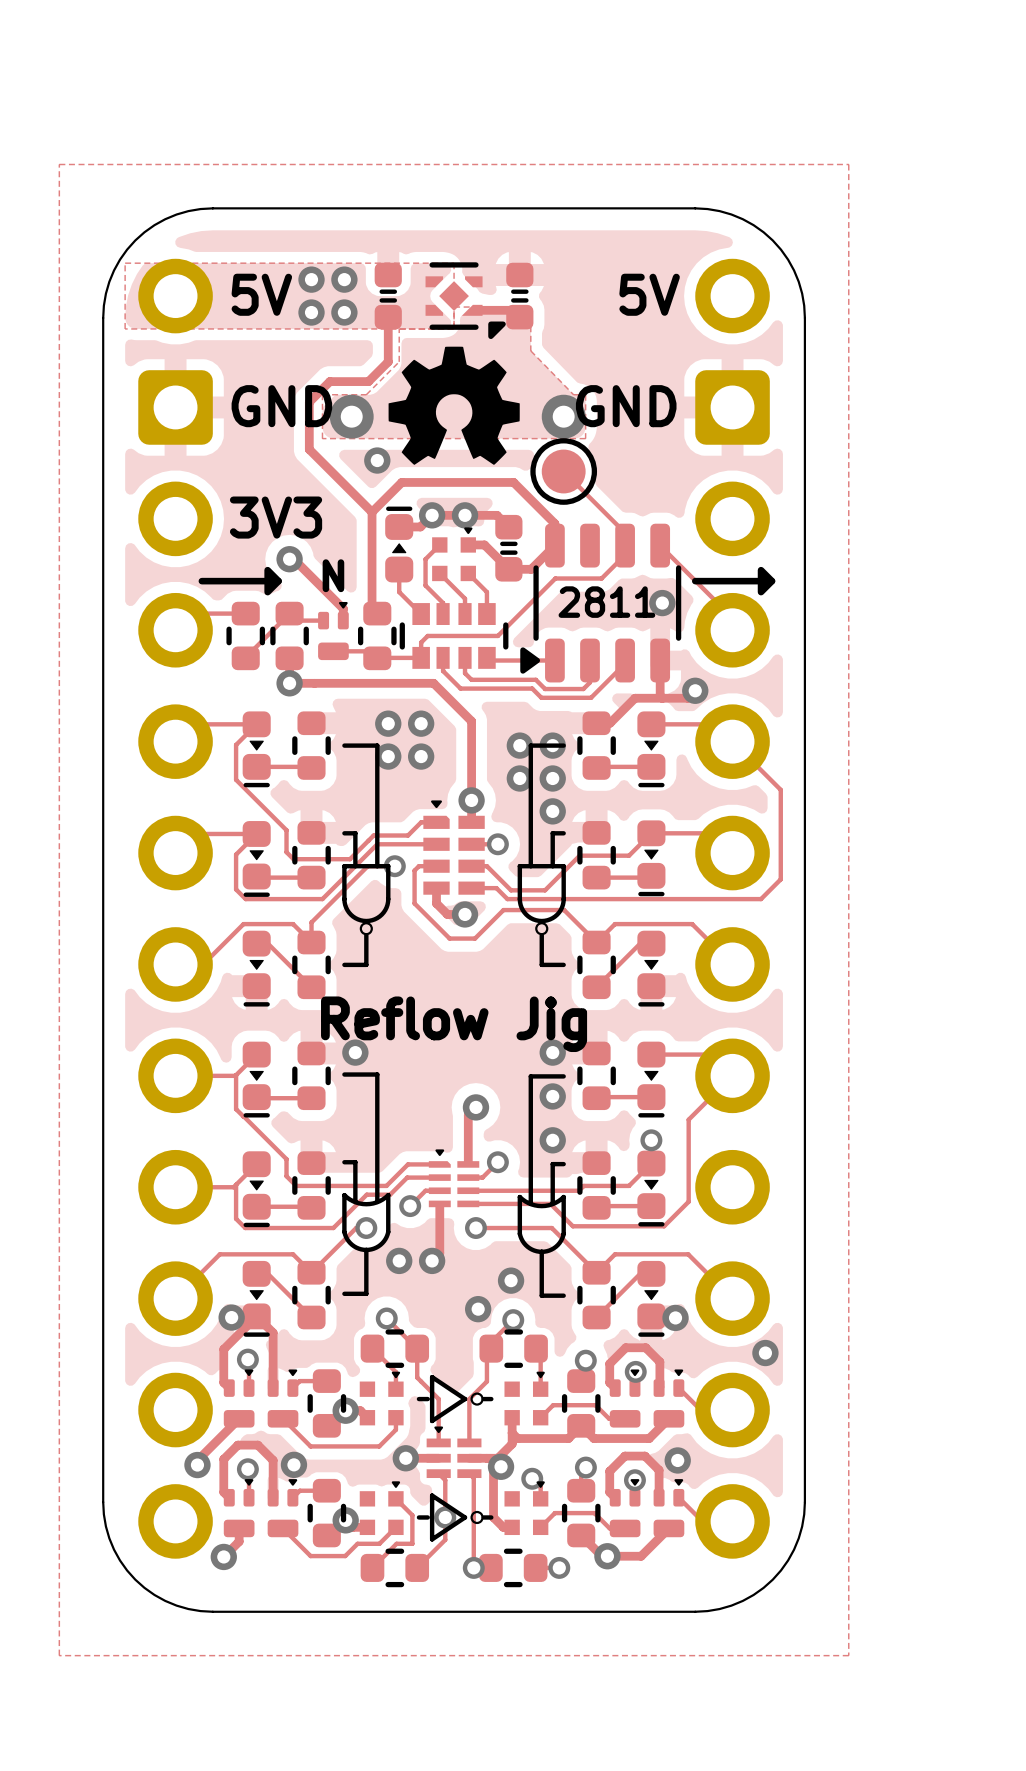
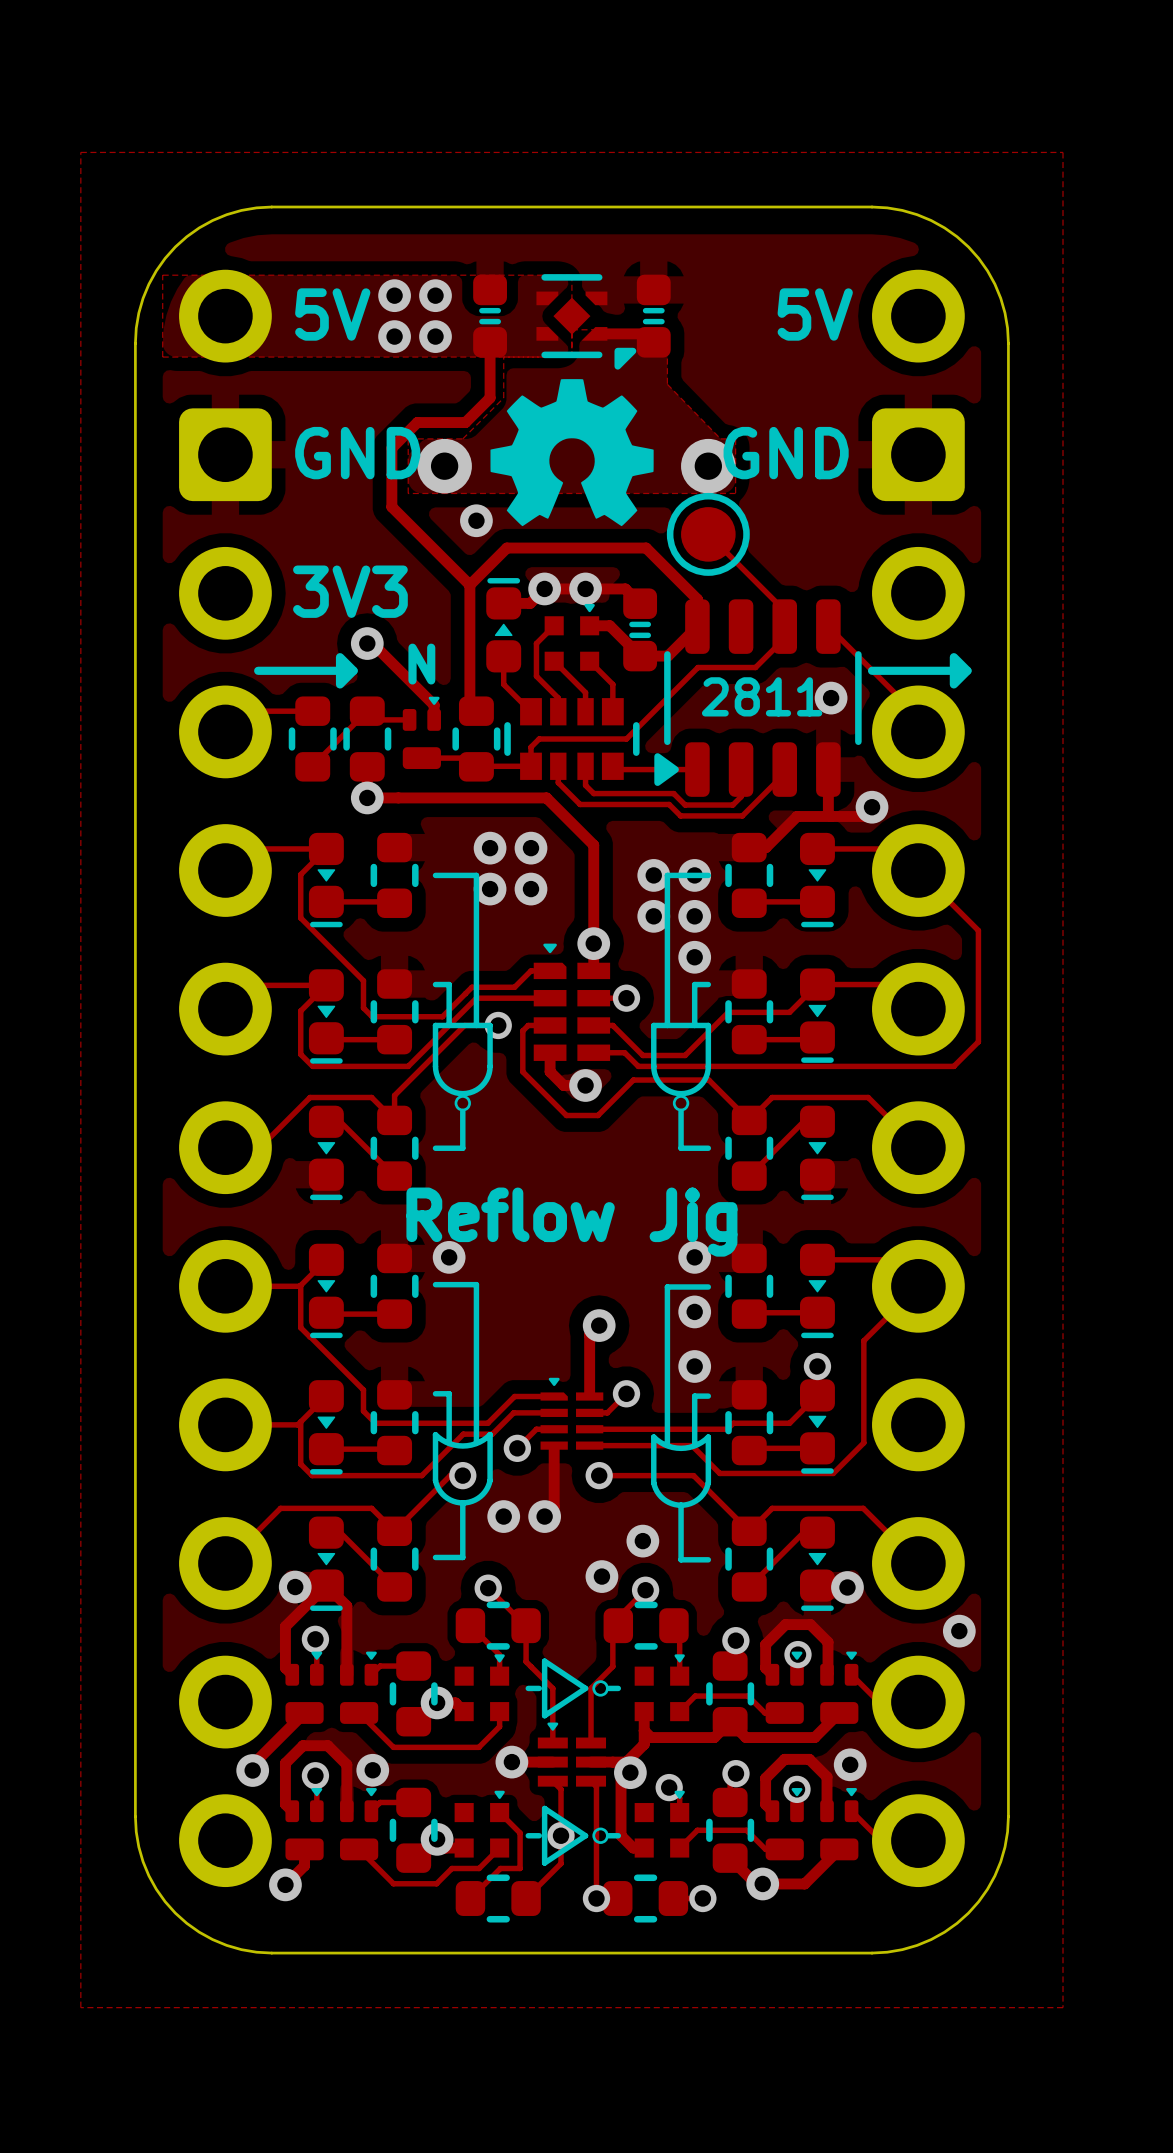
part footprint: [520, 523, 682, 683] -> [654, 599, 862, 797]

